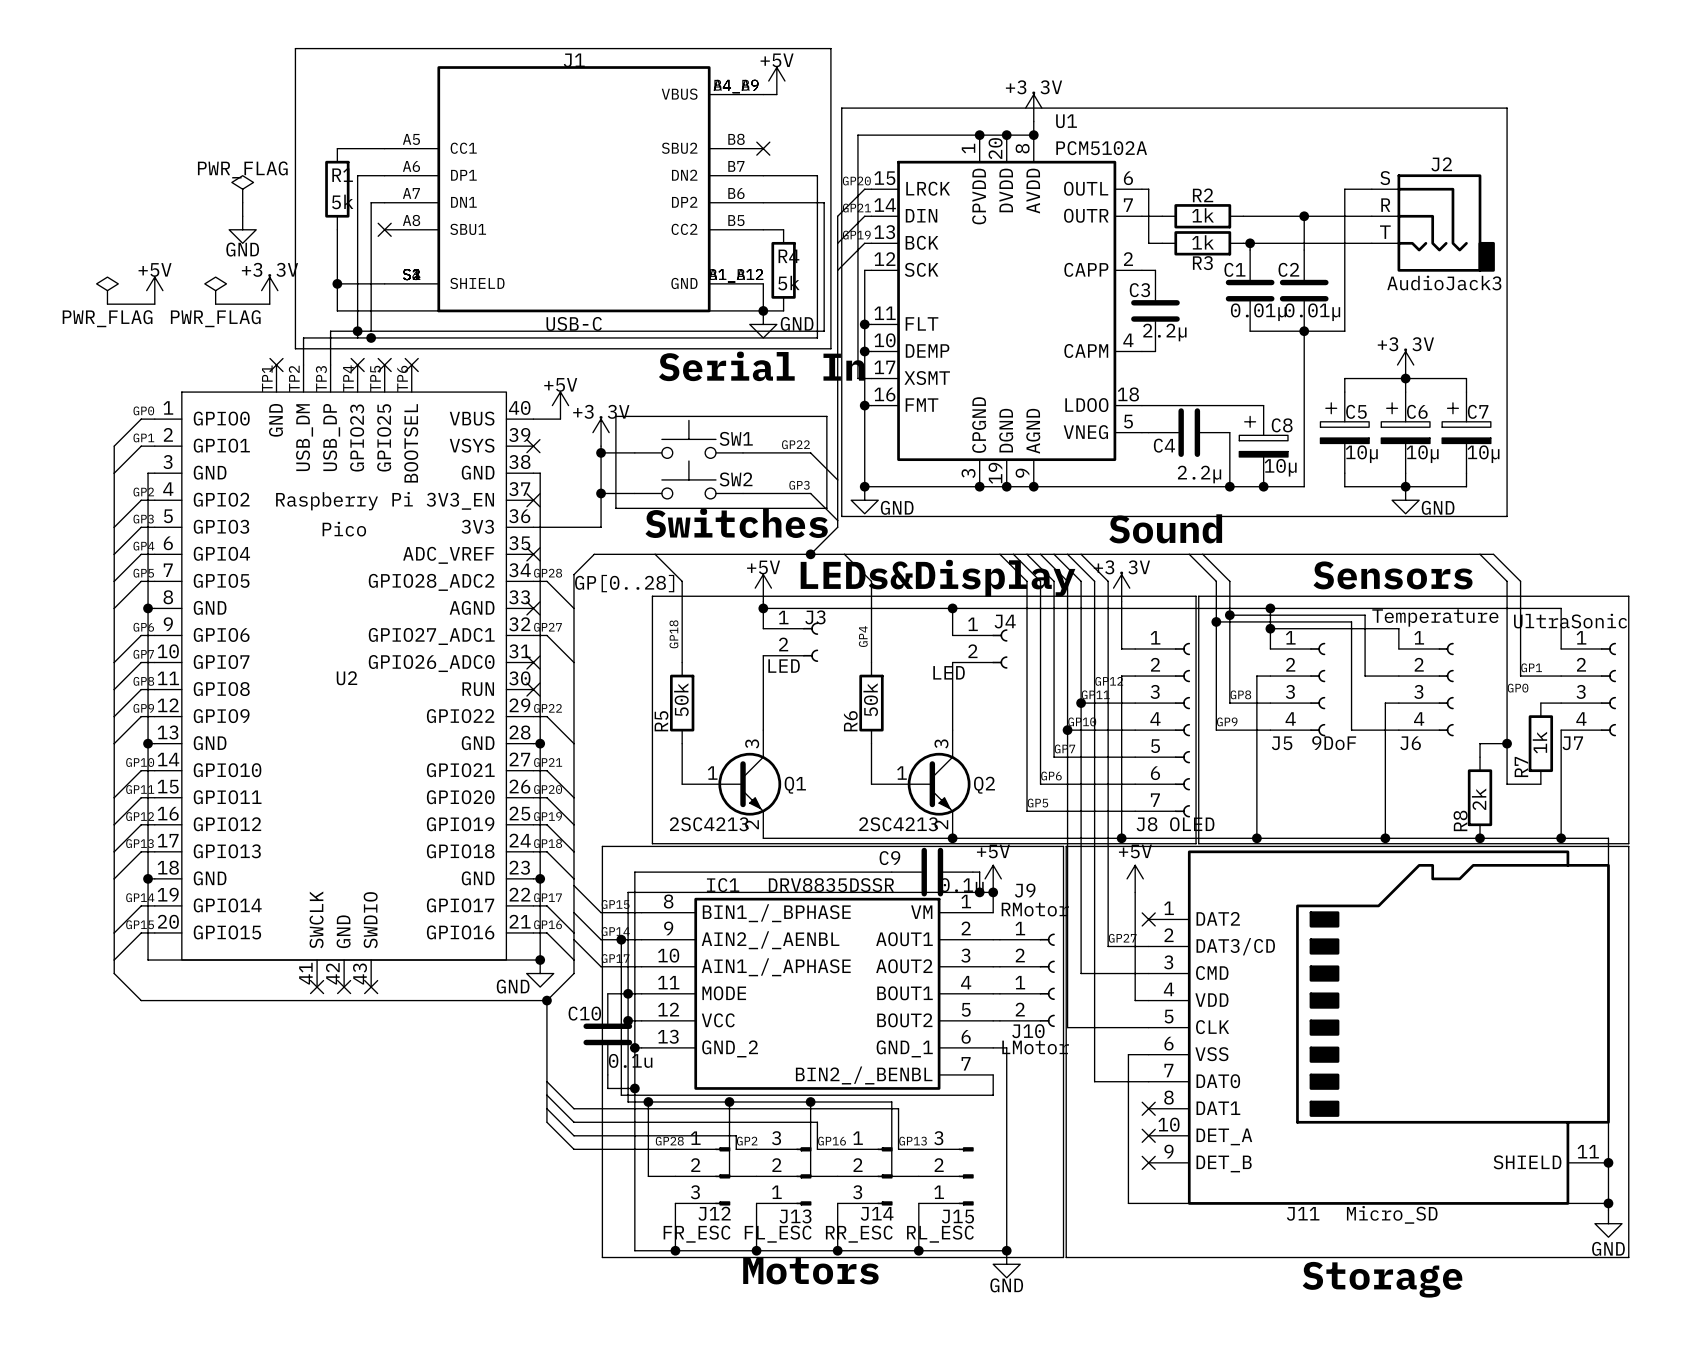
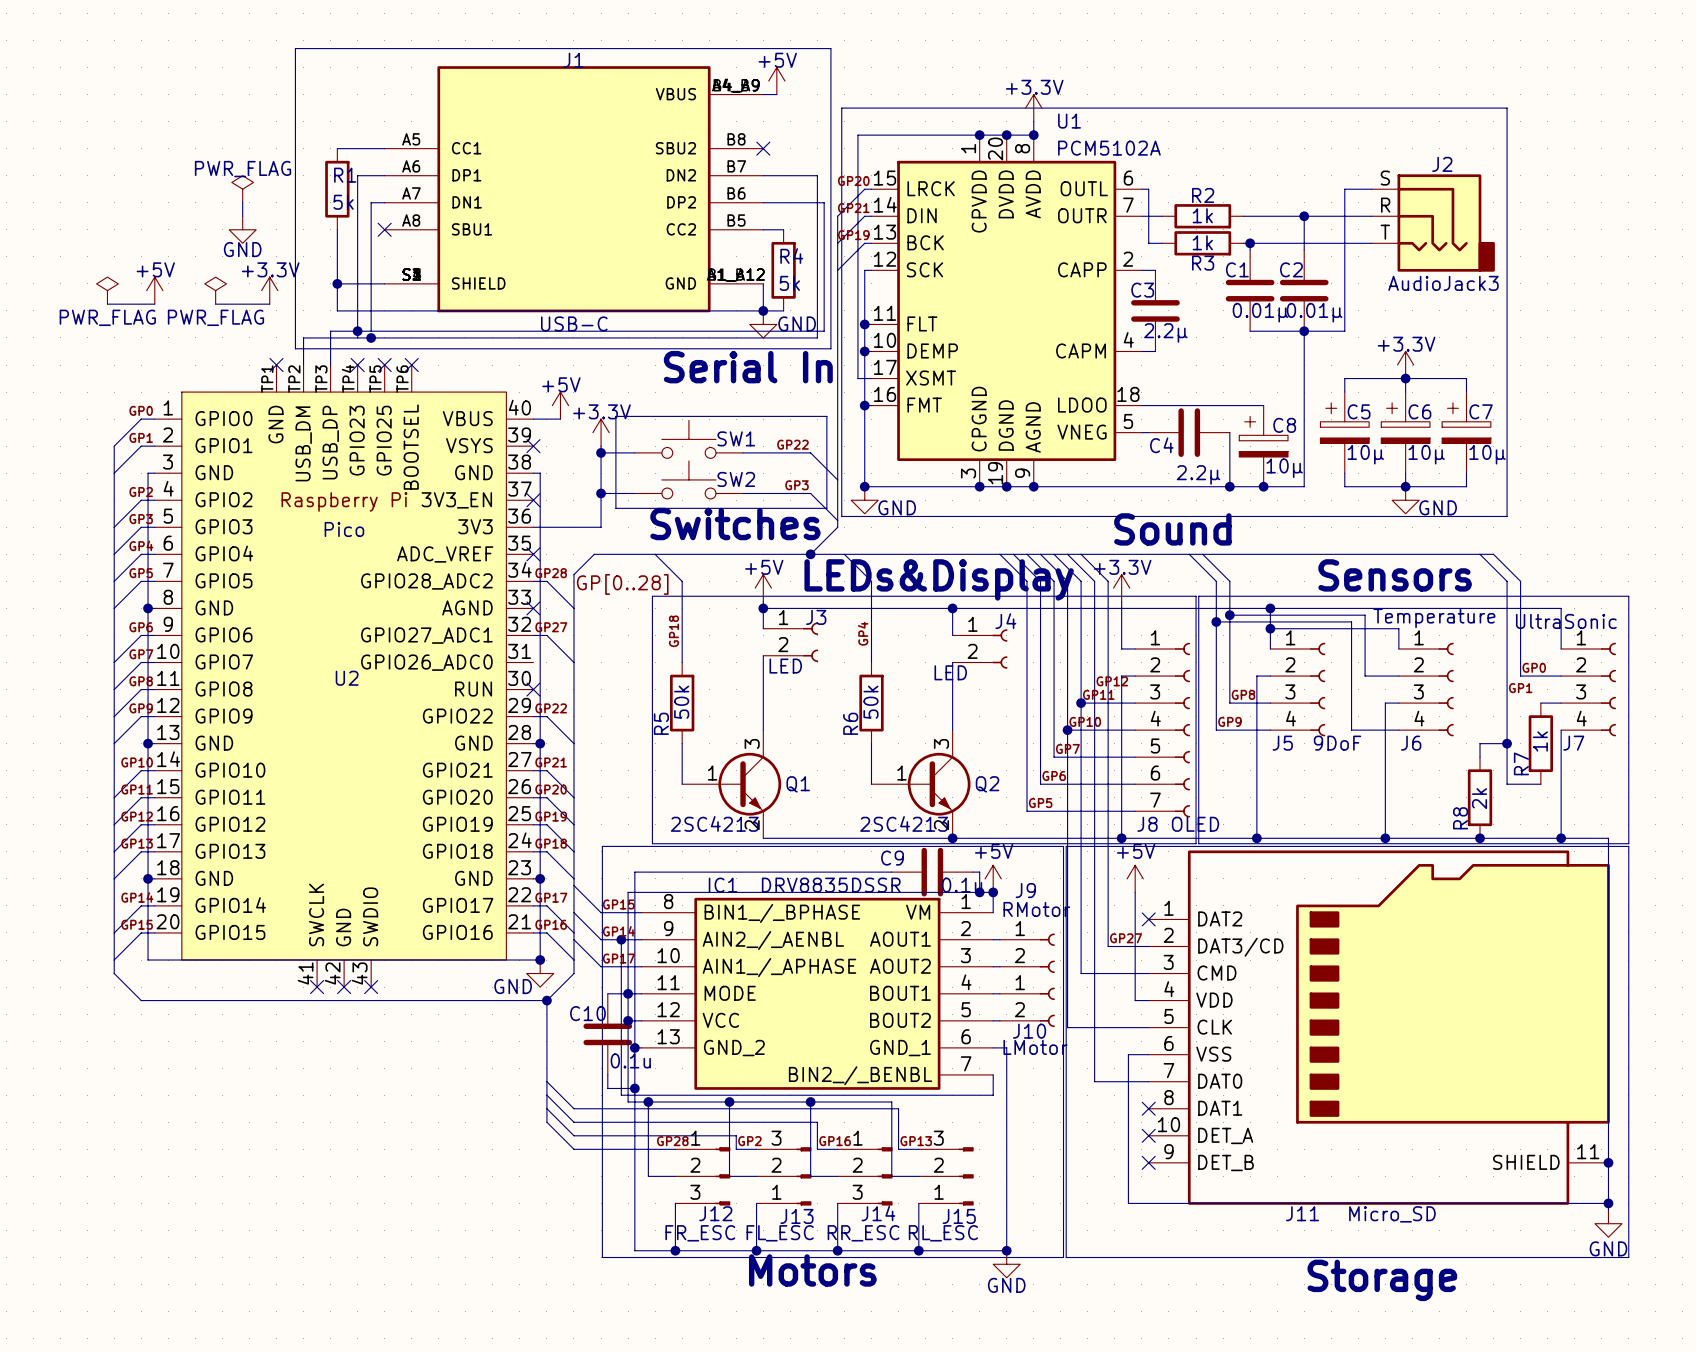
no-connect mark: (533, 662) -> none
label: GP1 (1531, 667) -> GP0 (1534, 667)
label: GP0 (1518, 688) -> GP1 (1520, 688)

